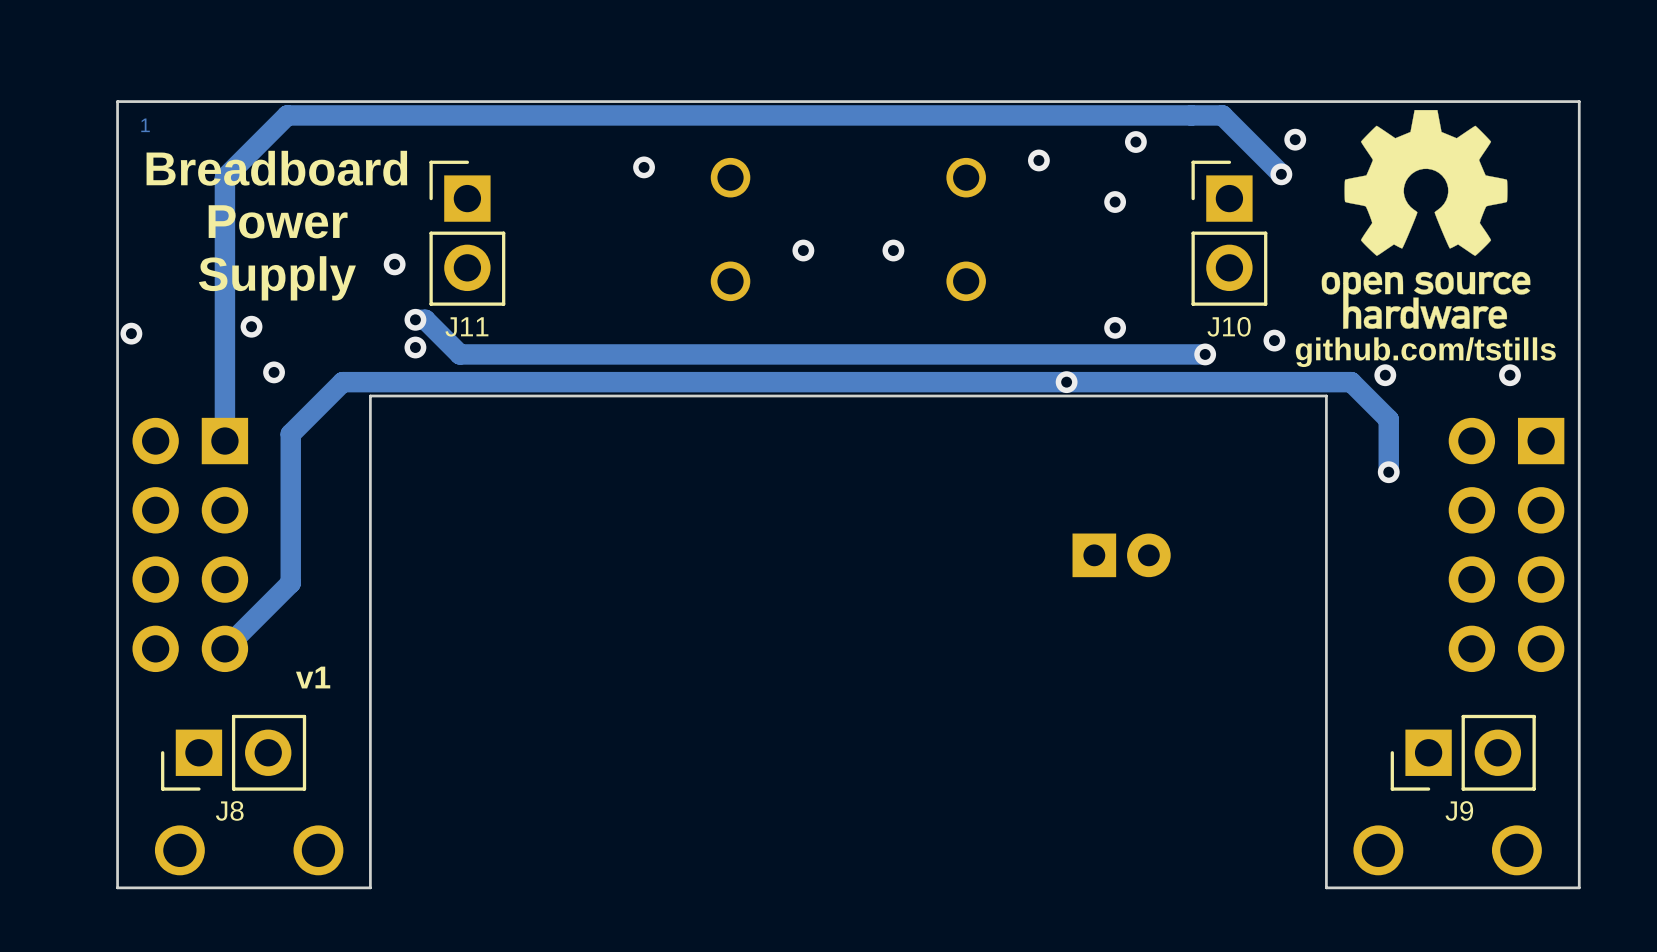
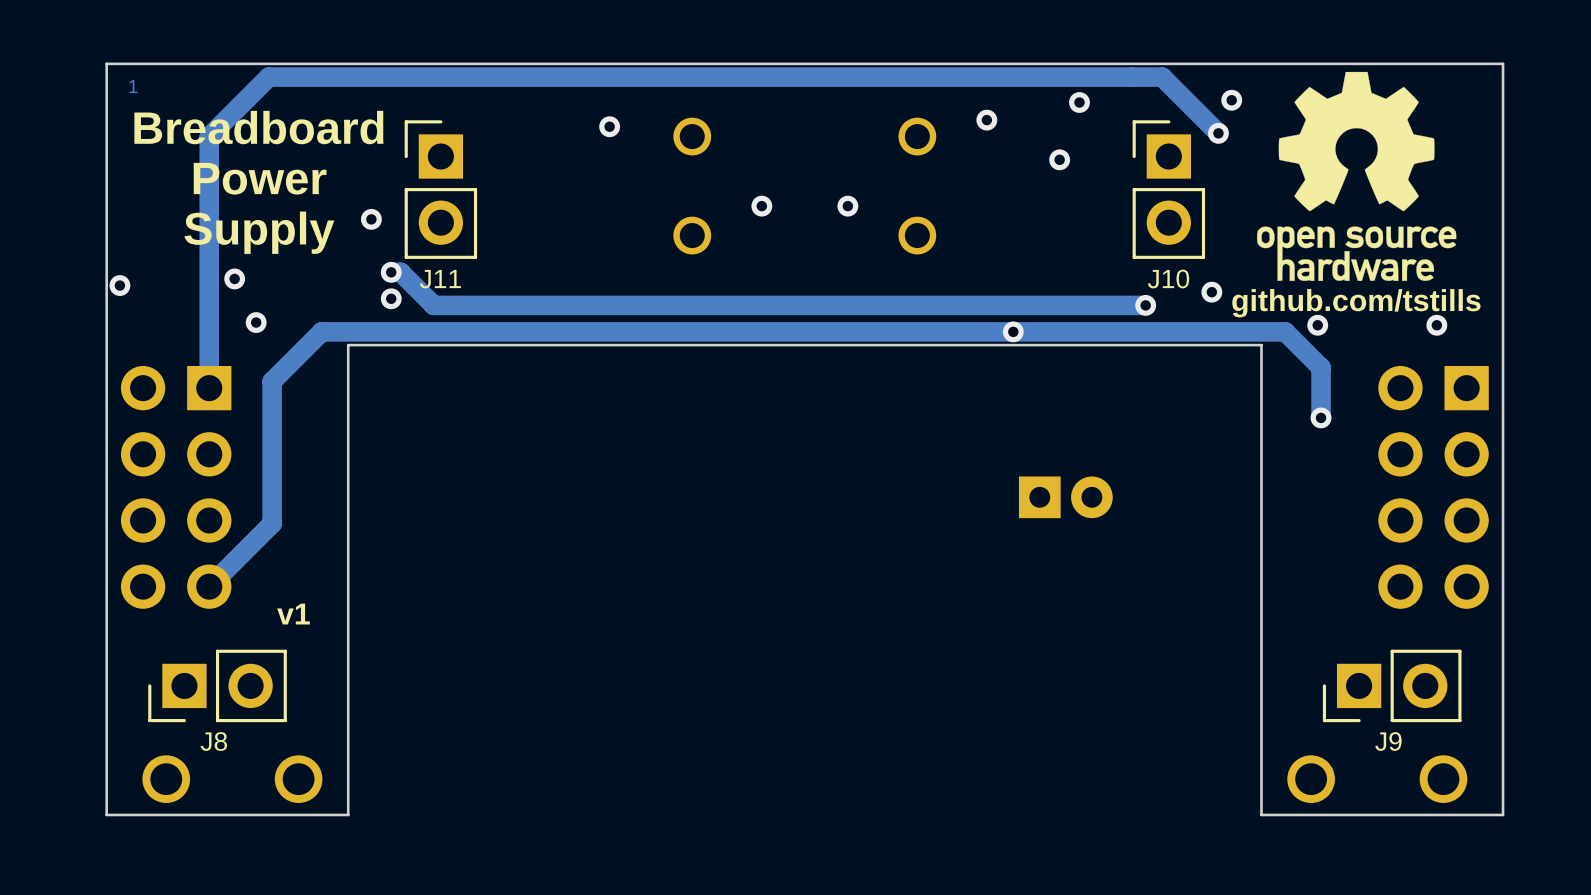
via: (1115, 327) -> none

